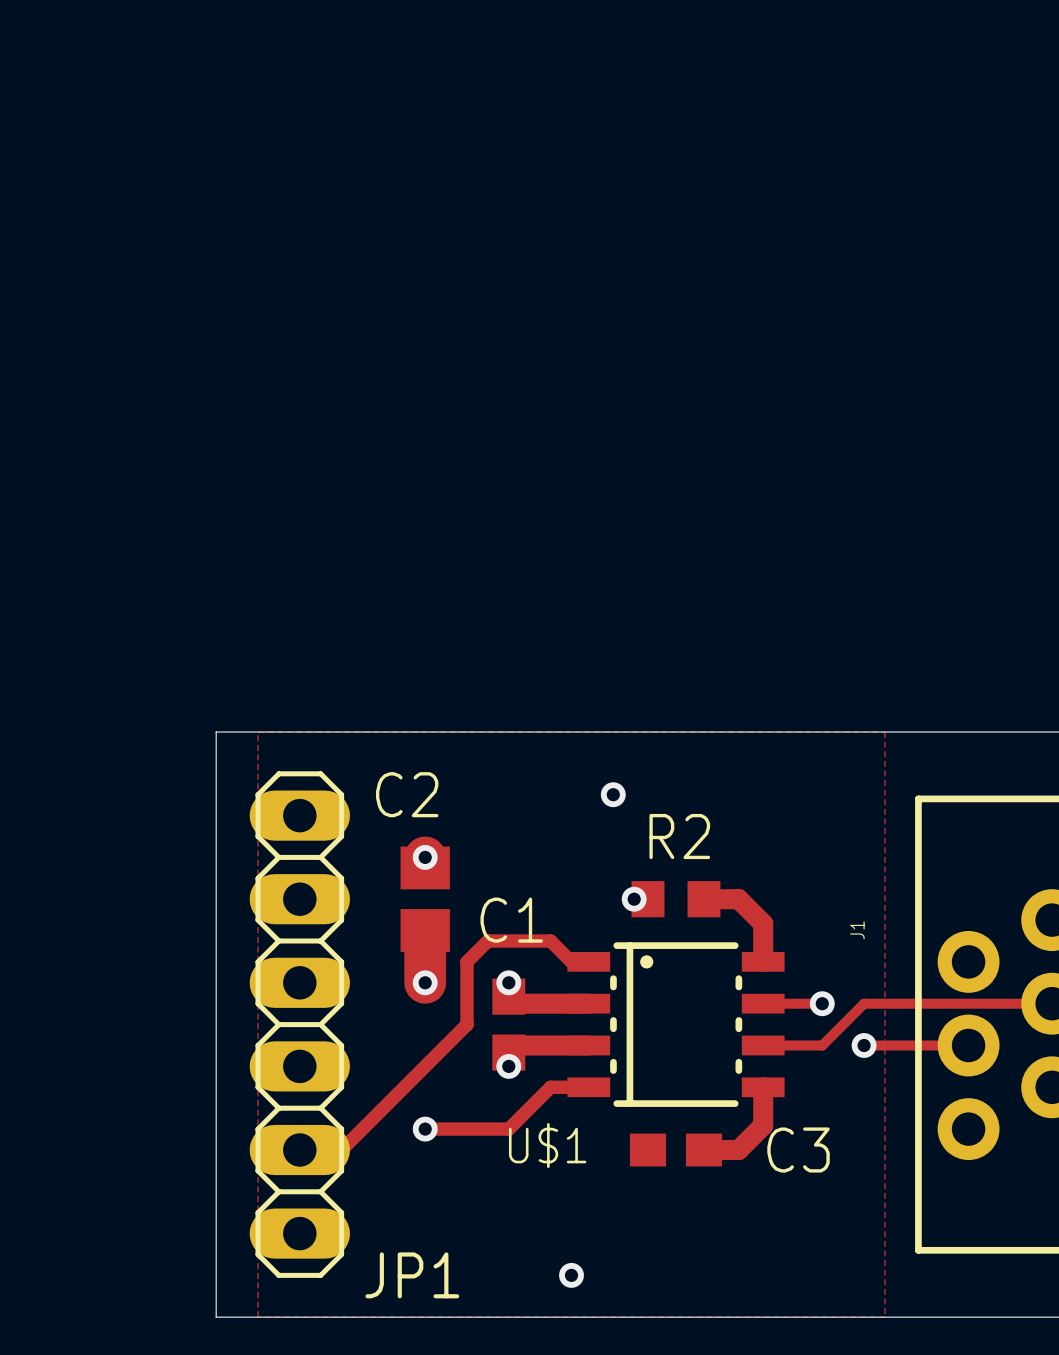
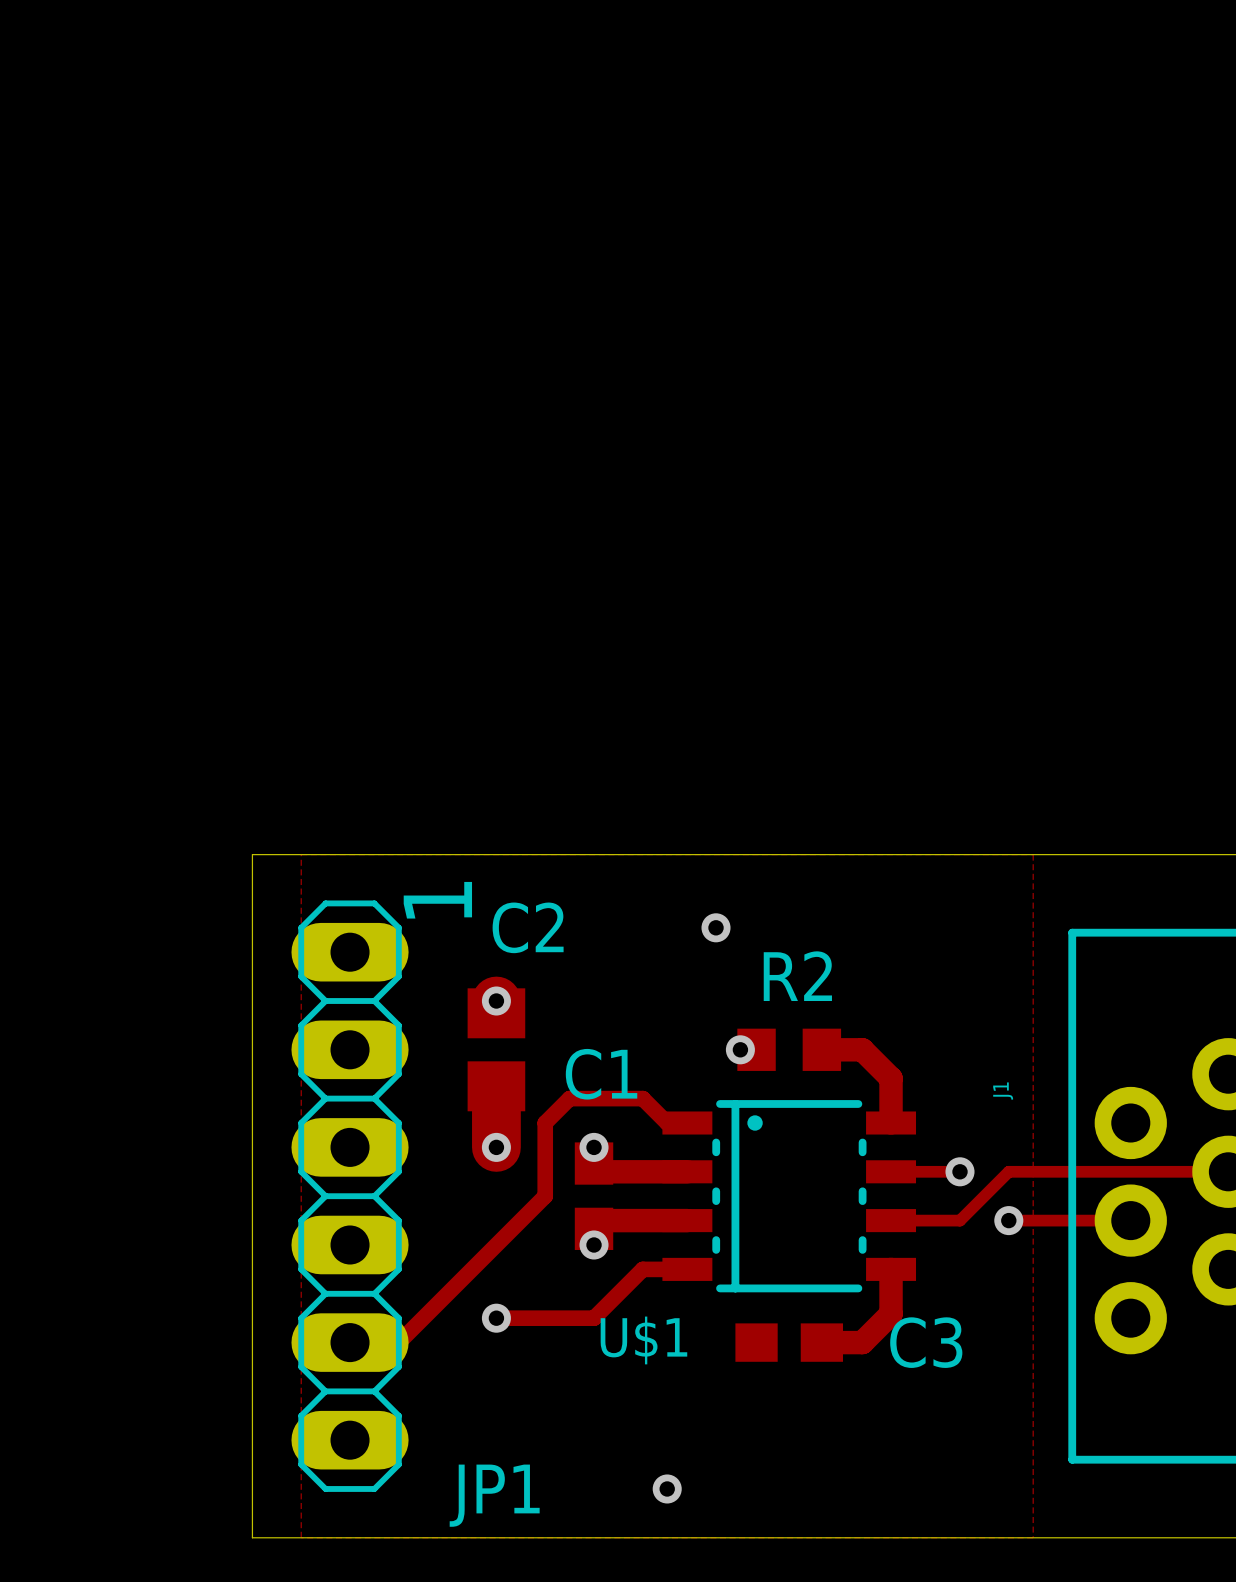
text: none -> 1 (437, 900)
C2 name position: C2 (407, 794) -> C2 (528, 927)

